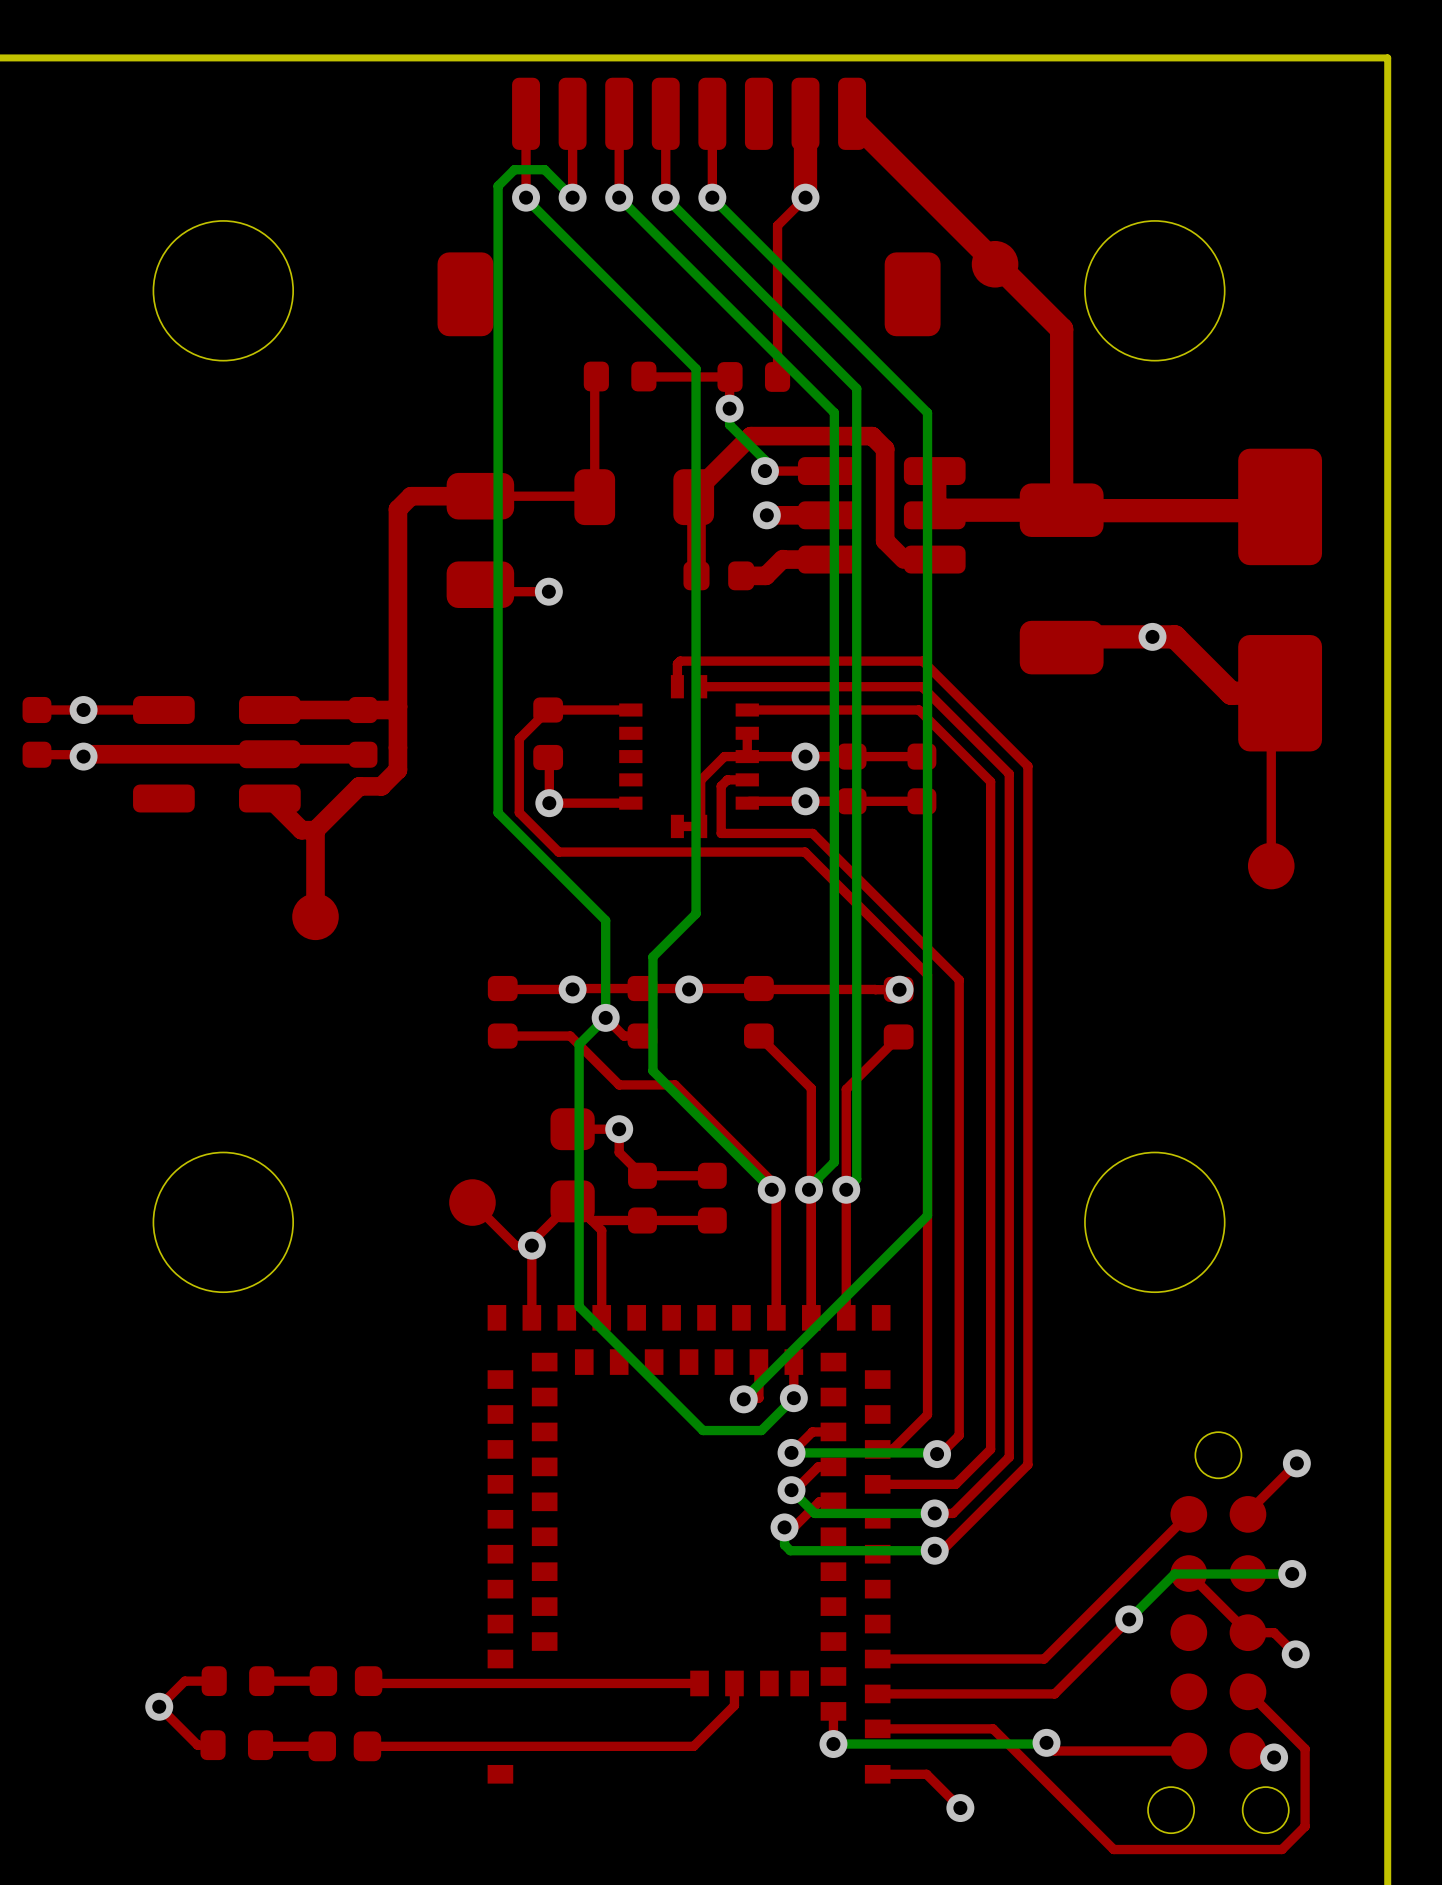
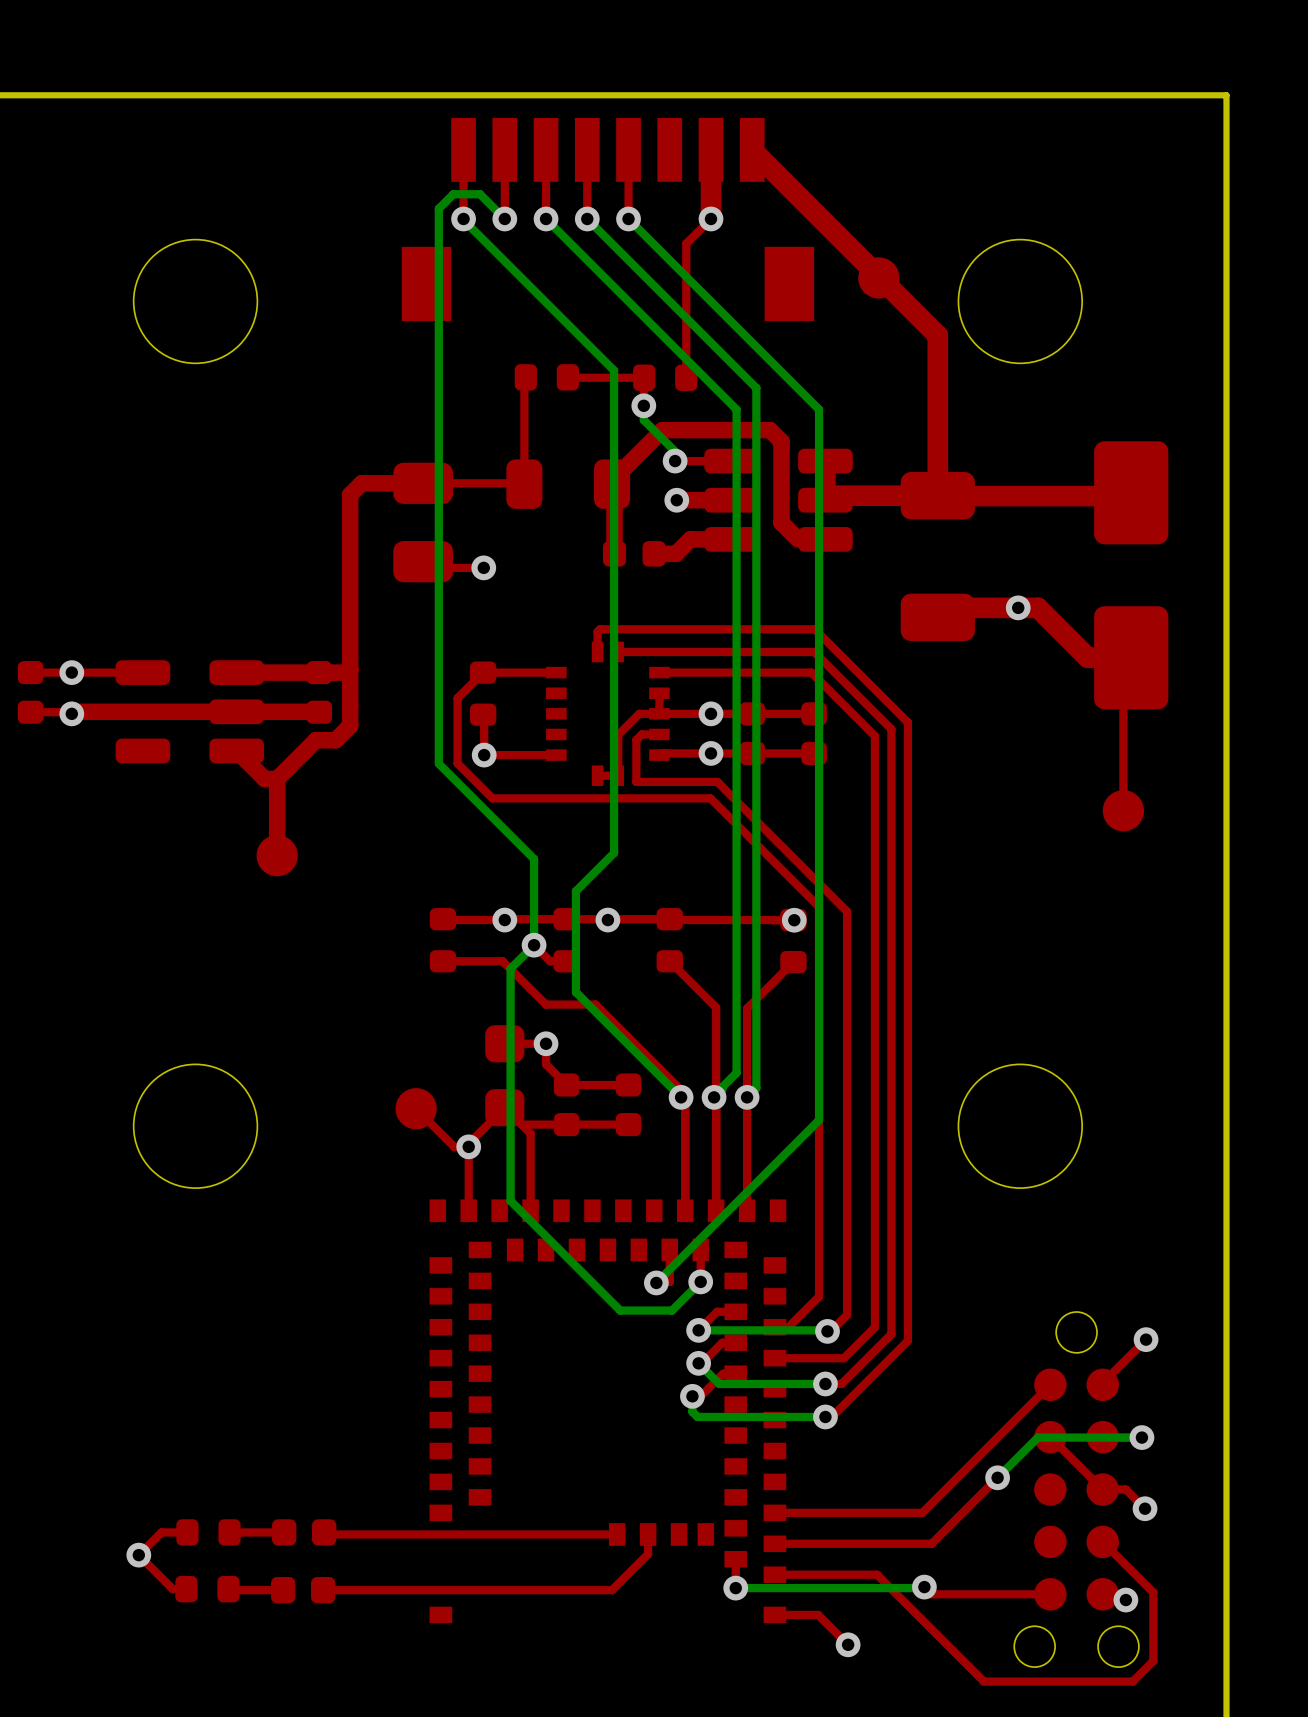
part footprint: [437, 77, 941, 337] -> [401, 117, 815, 322]

